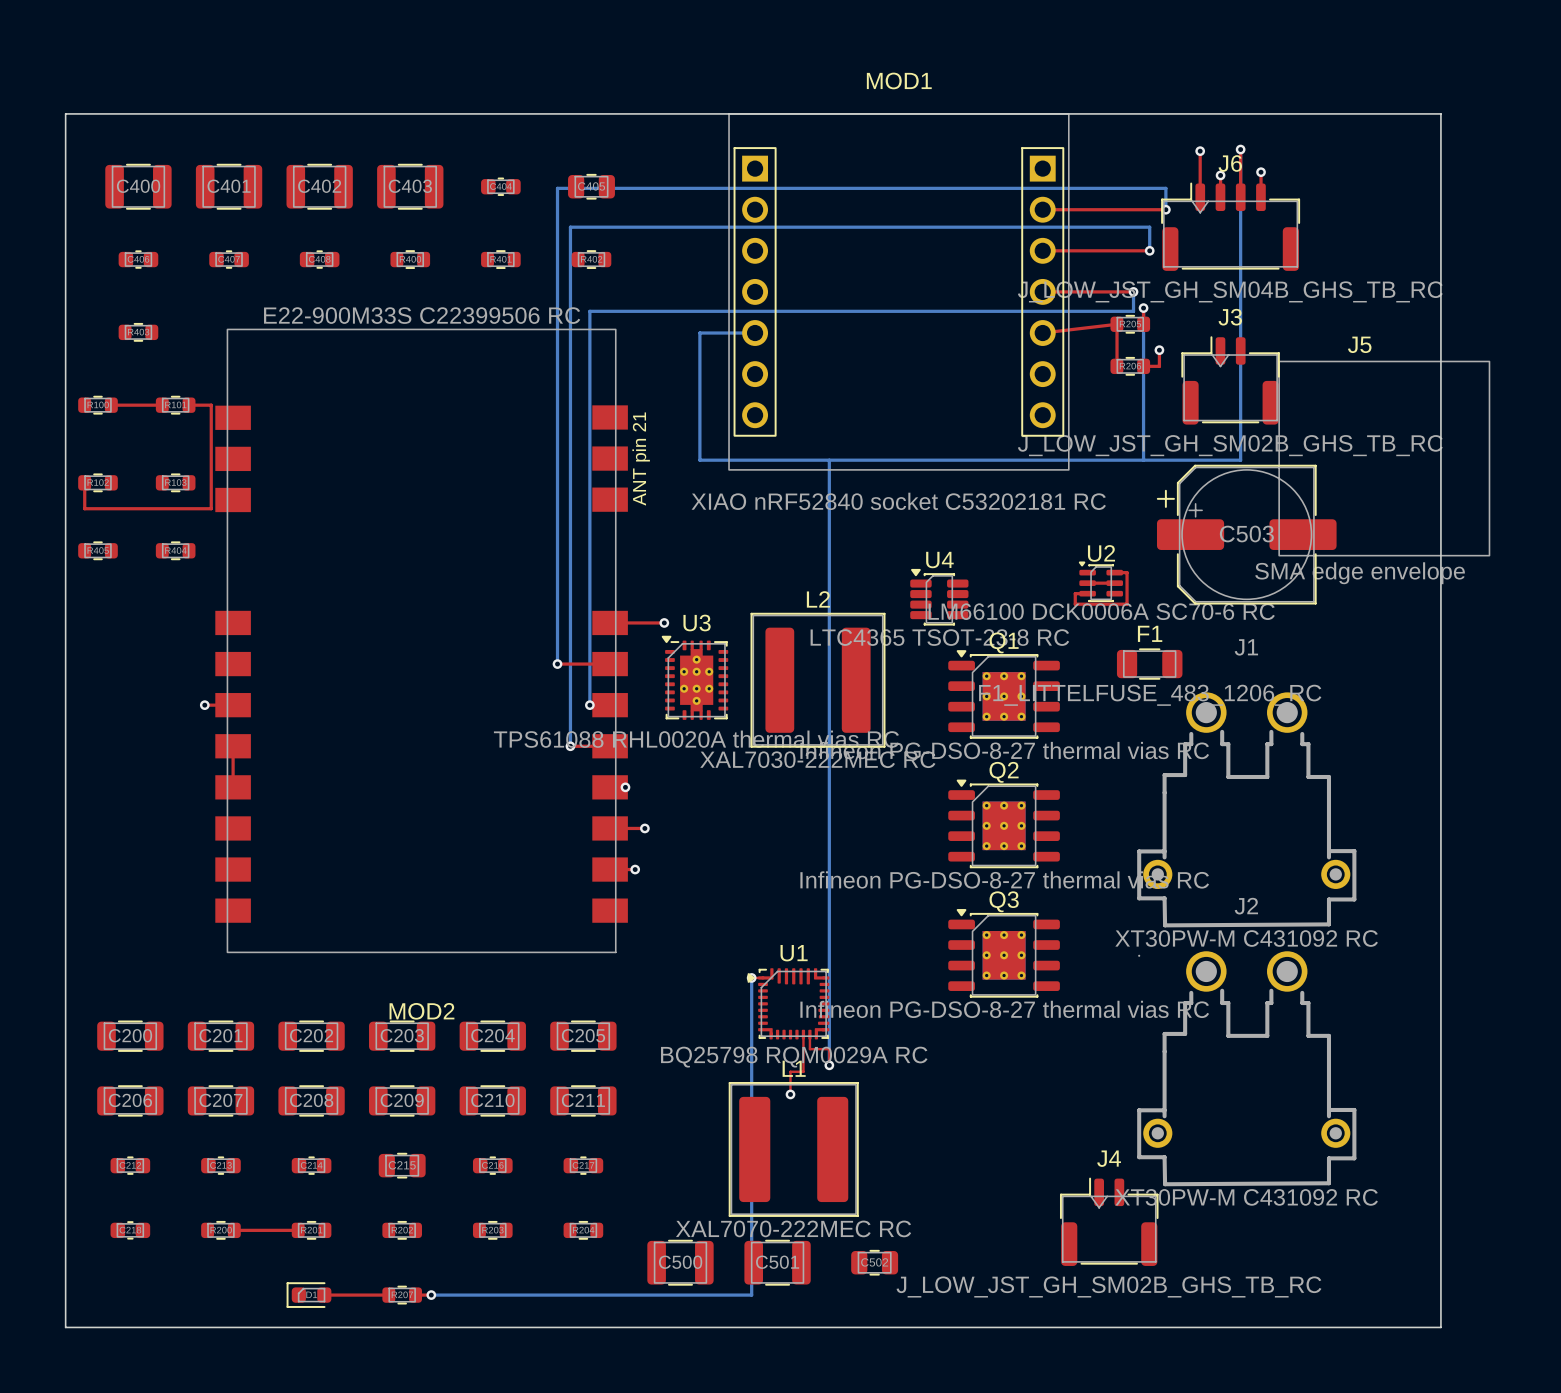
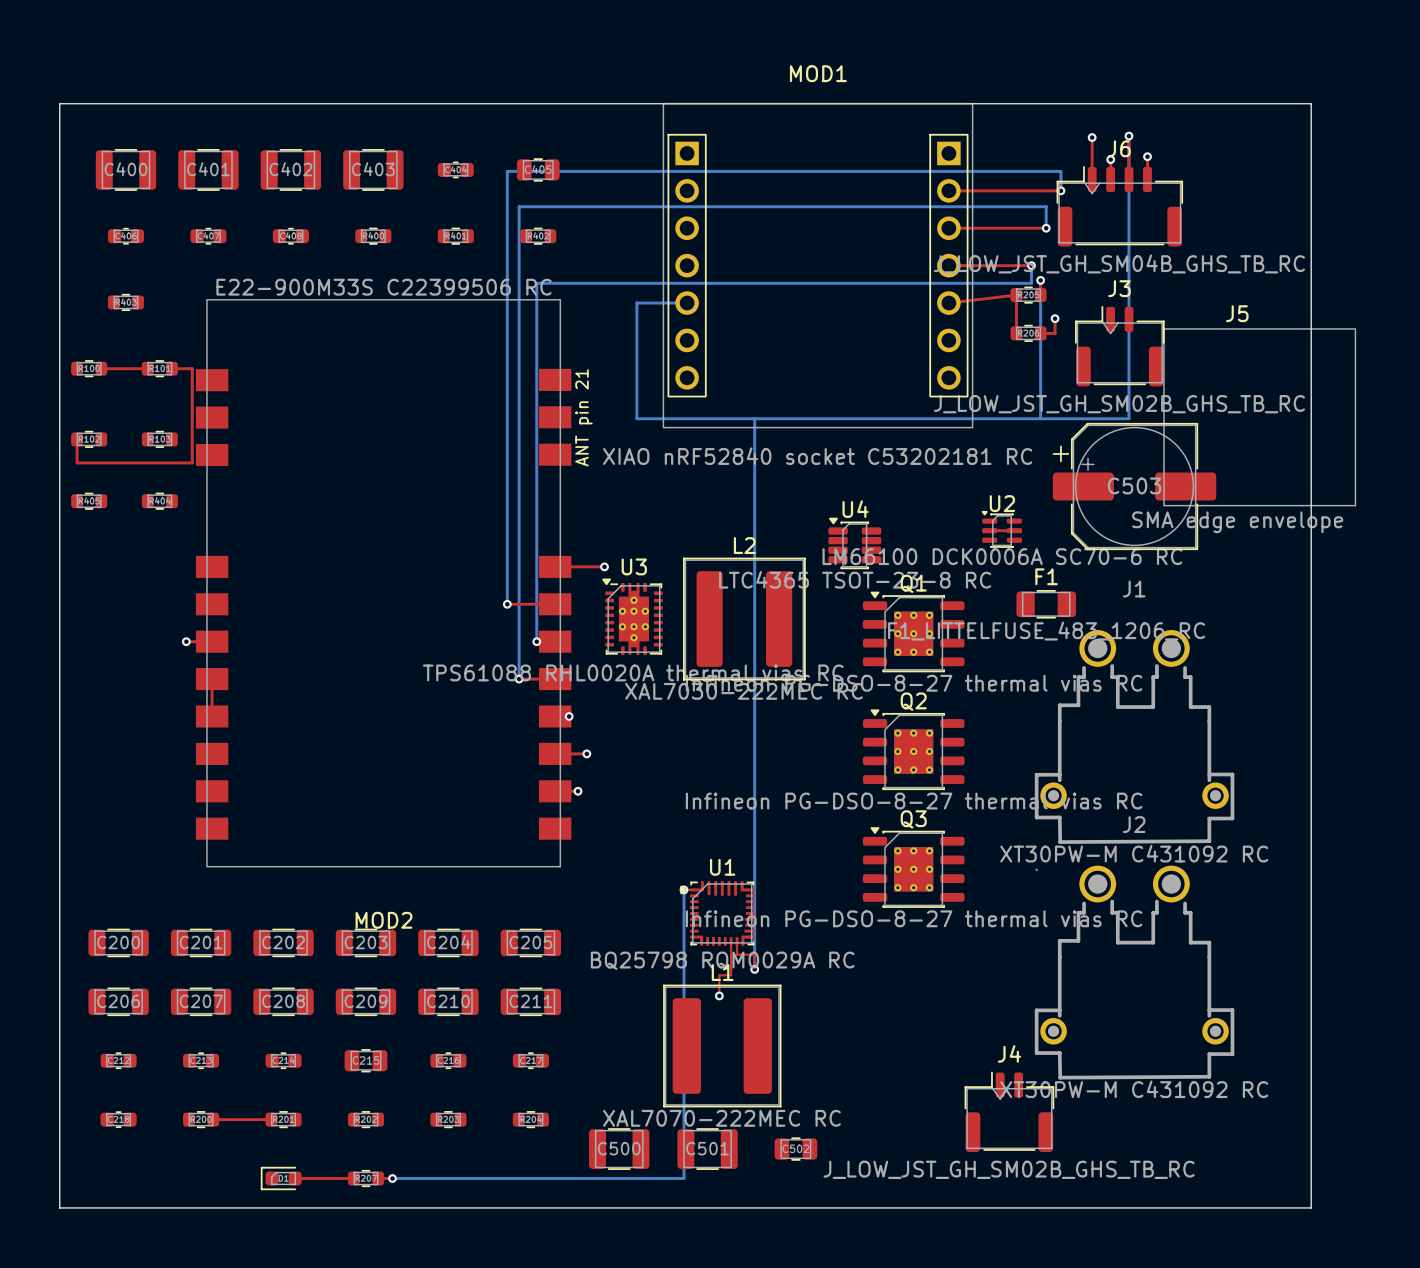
top track: (1114, 572) (1127, 572) (1127, 604) (1075, 604) (1075, 593) (1087, 593) -> none

